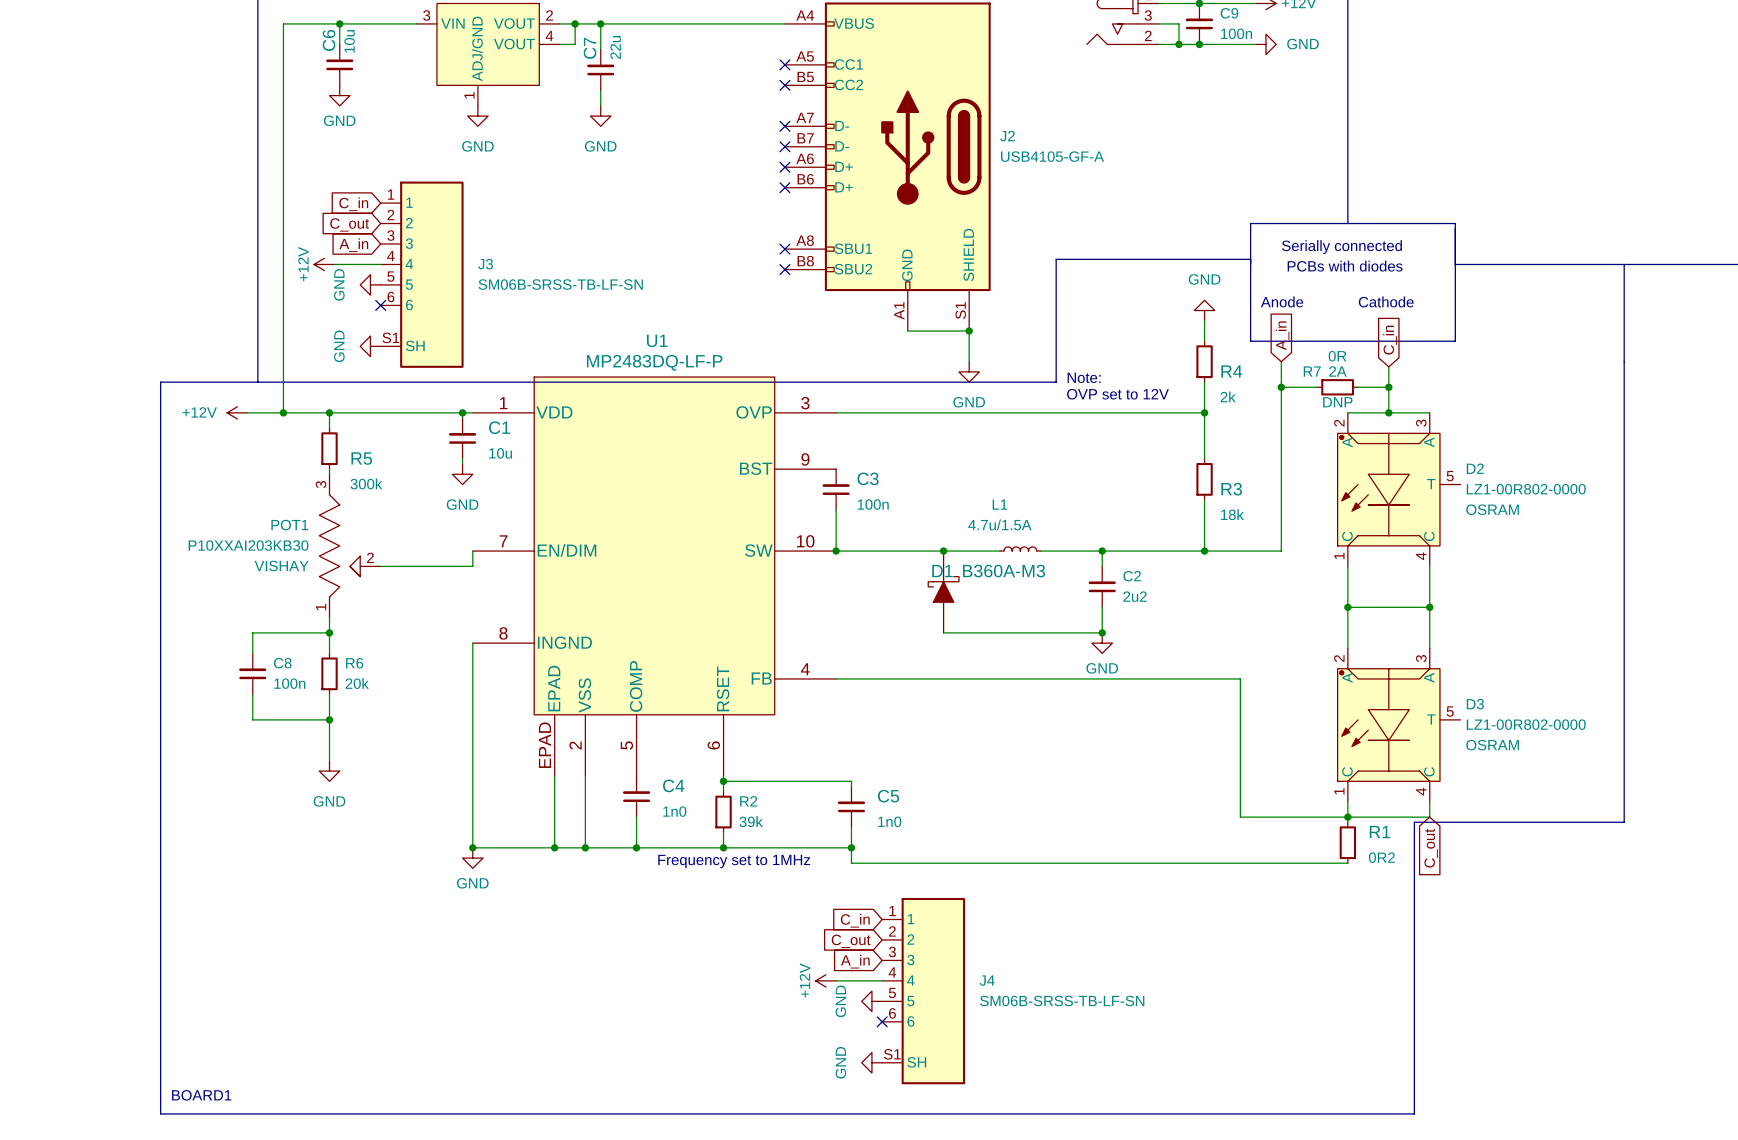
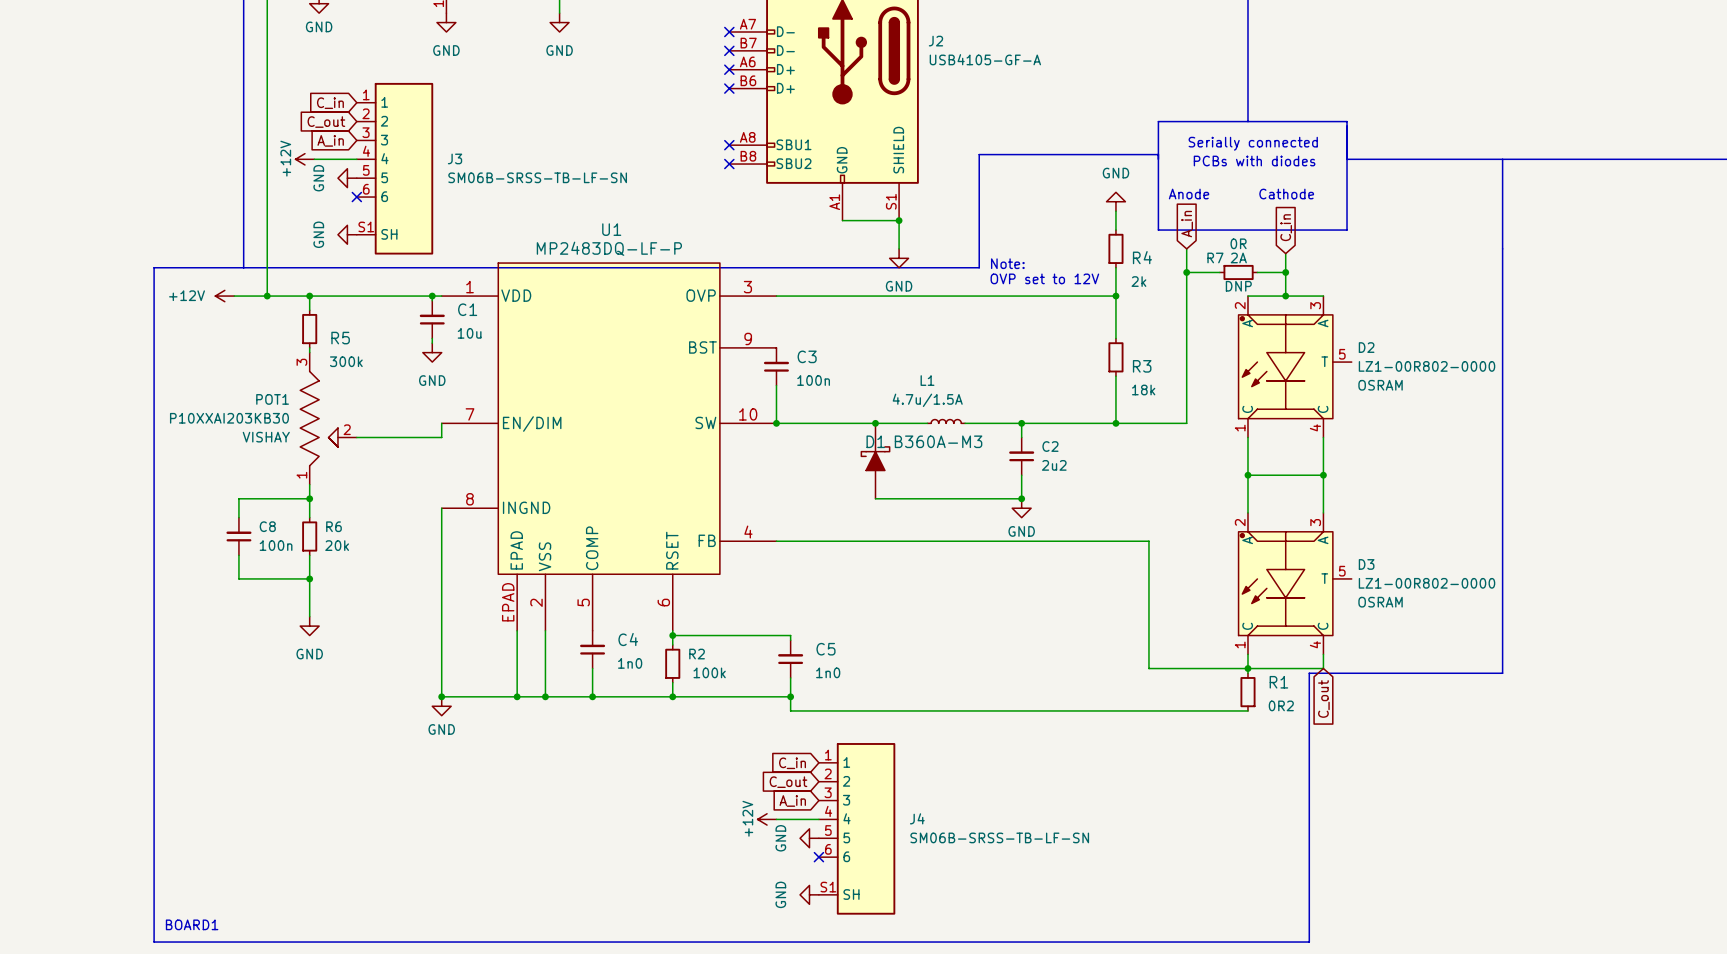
R2 text: 39k (751, 821) -> 100k (709, 672)
text: Frequency set to 1MHz (734, 861) -> none

